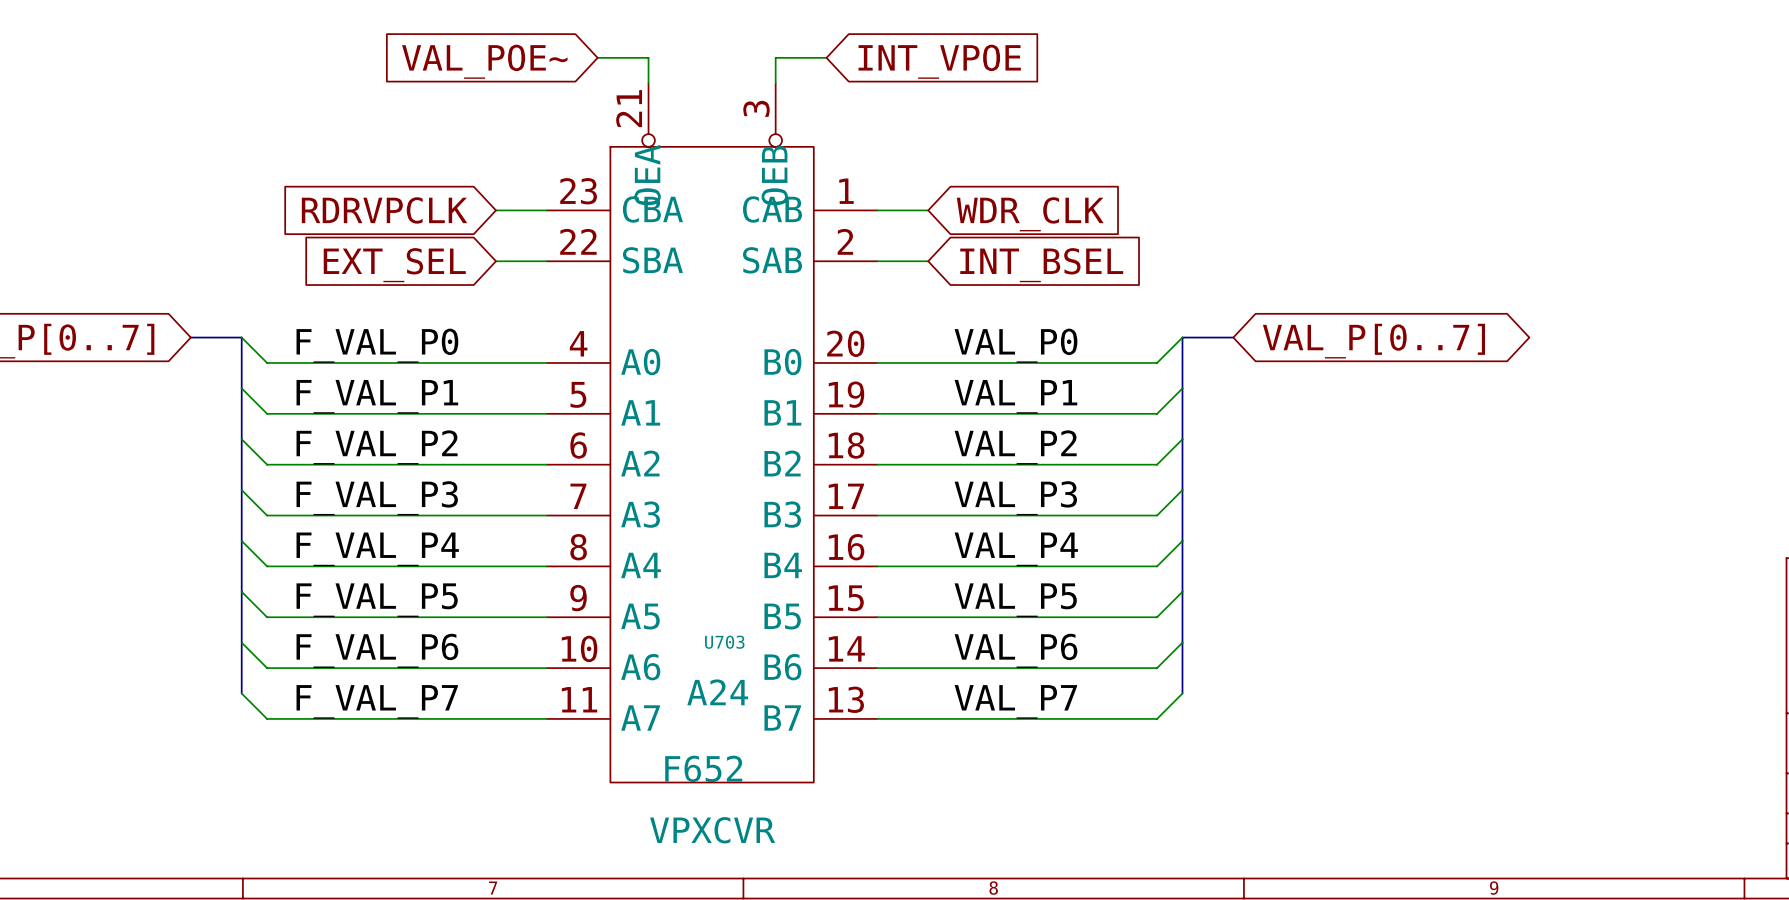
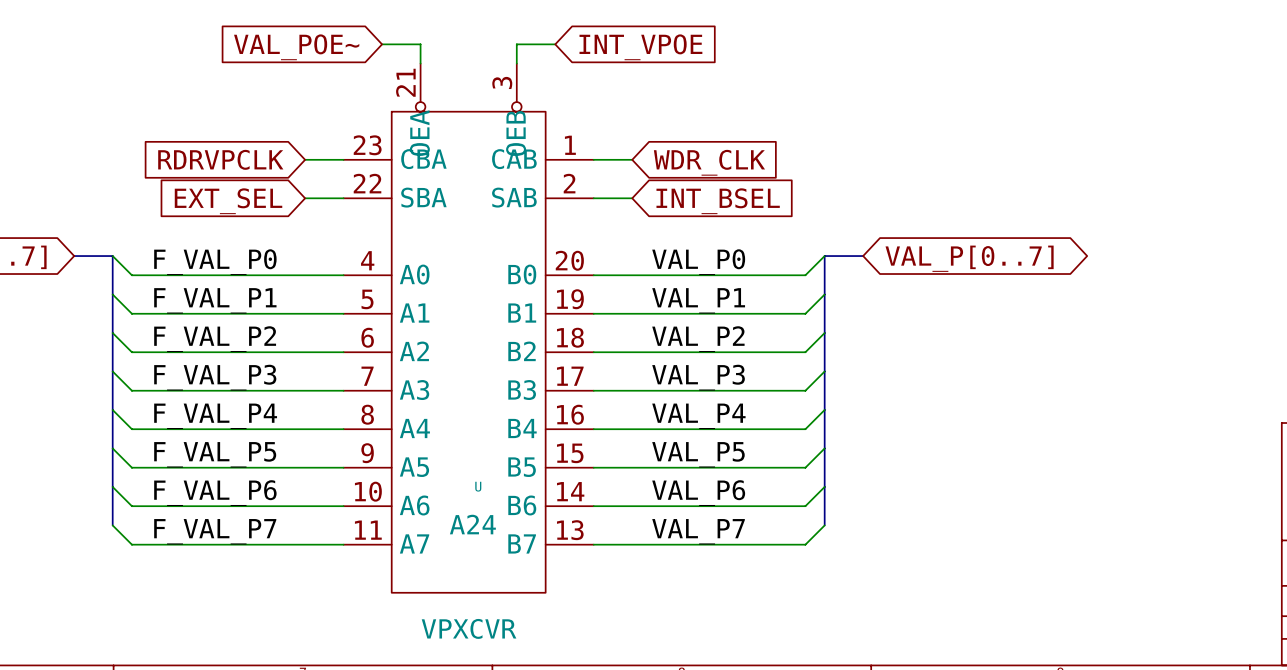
U703 name: U703 (724, 642) -> U (478, 486)
U703 value: F652 (703, 768) -> none

